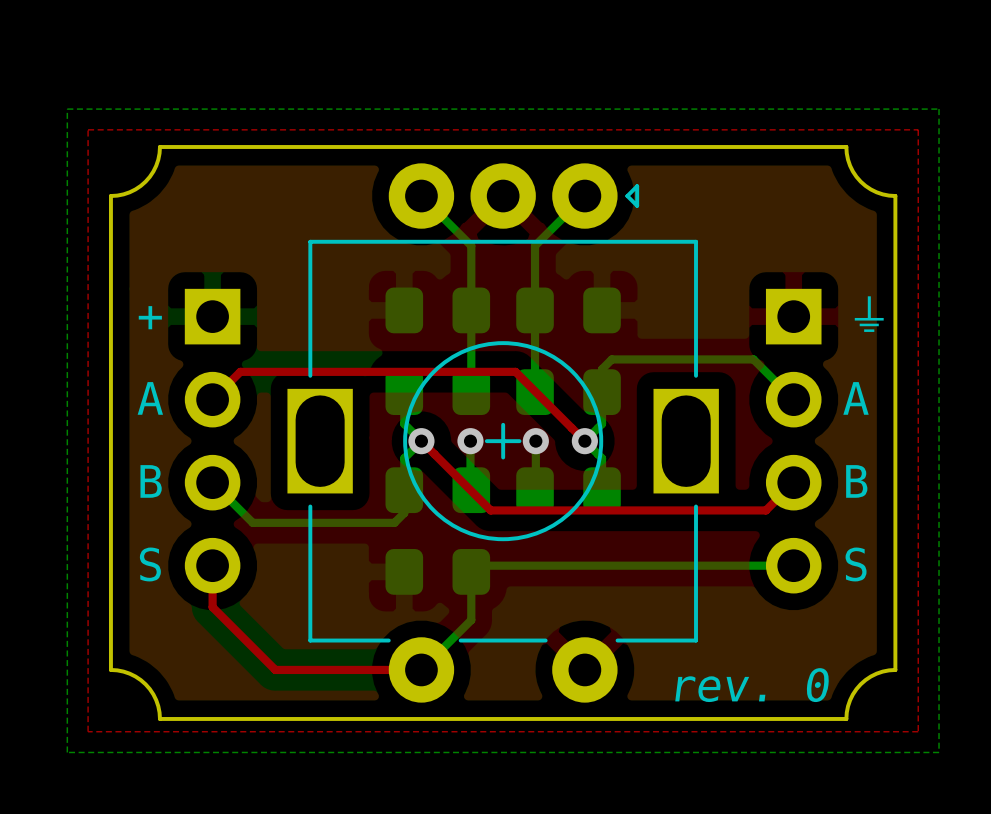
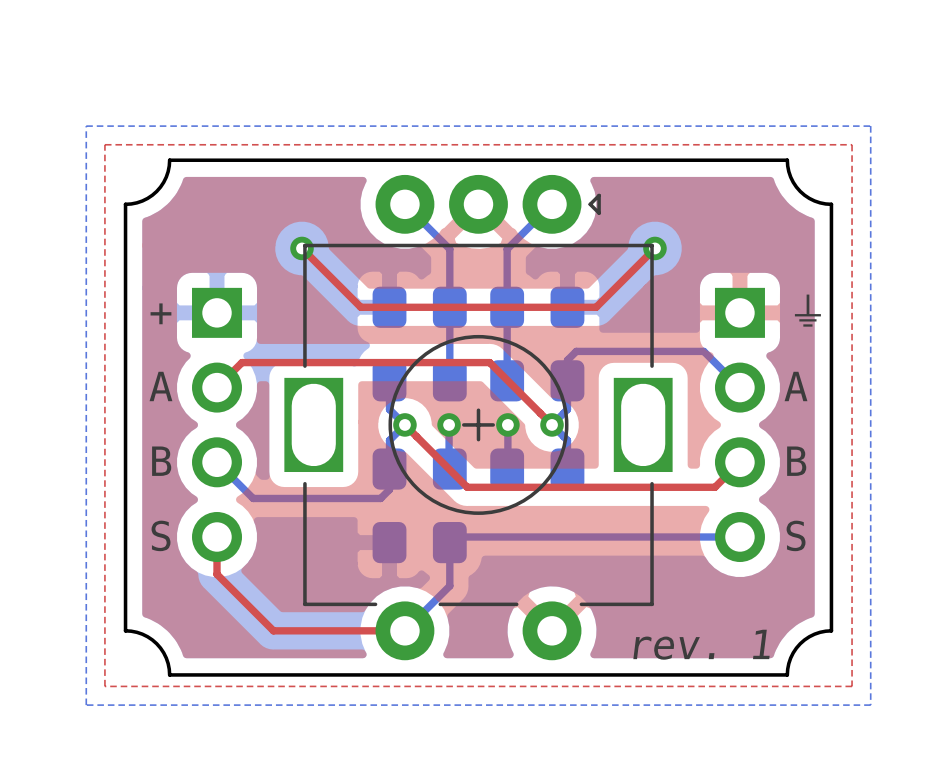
top track: none -> (302, 248) (360, 307) (596, 307) (654, 248)
via: none -> (302, 248)
via: none -> (654, 248)
text: rev. 0 (752, 685) -> rev. 1 (701, 644)

